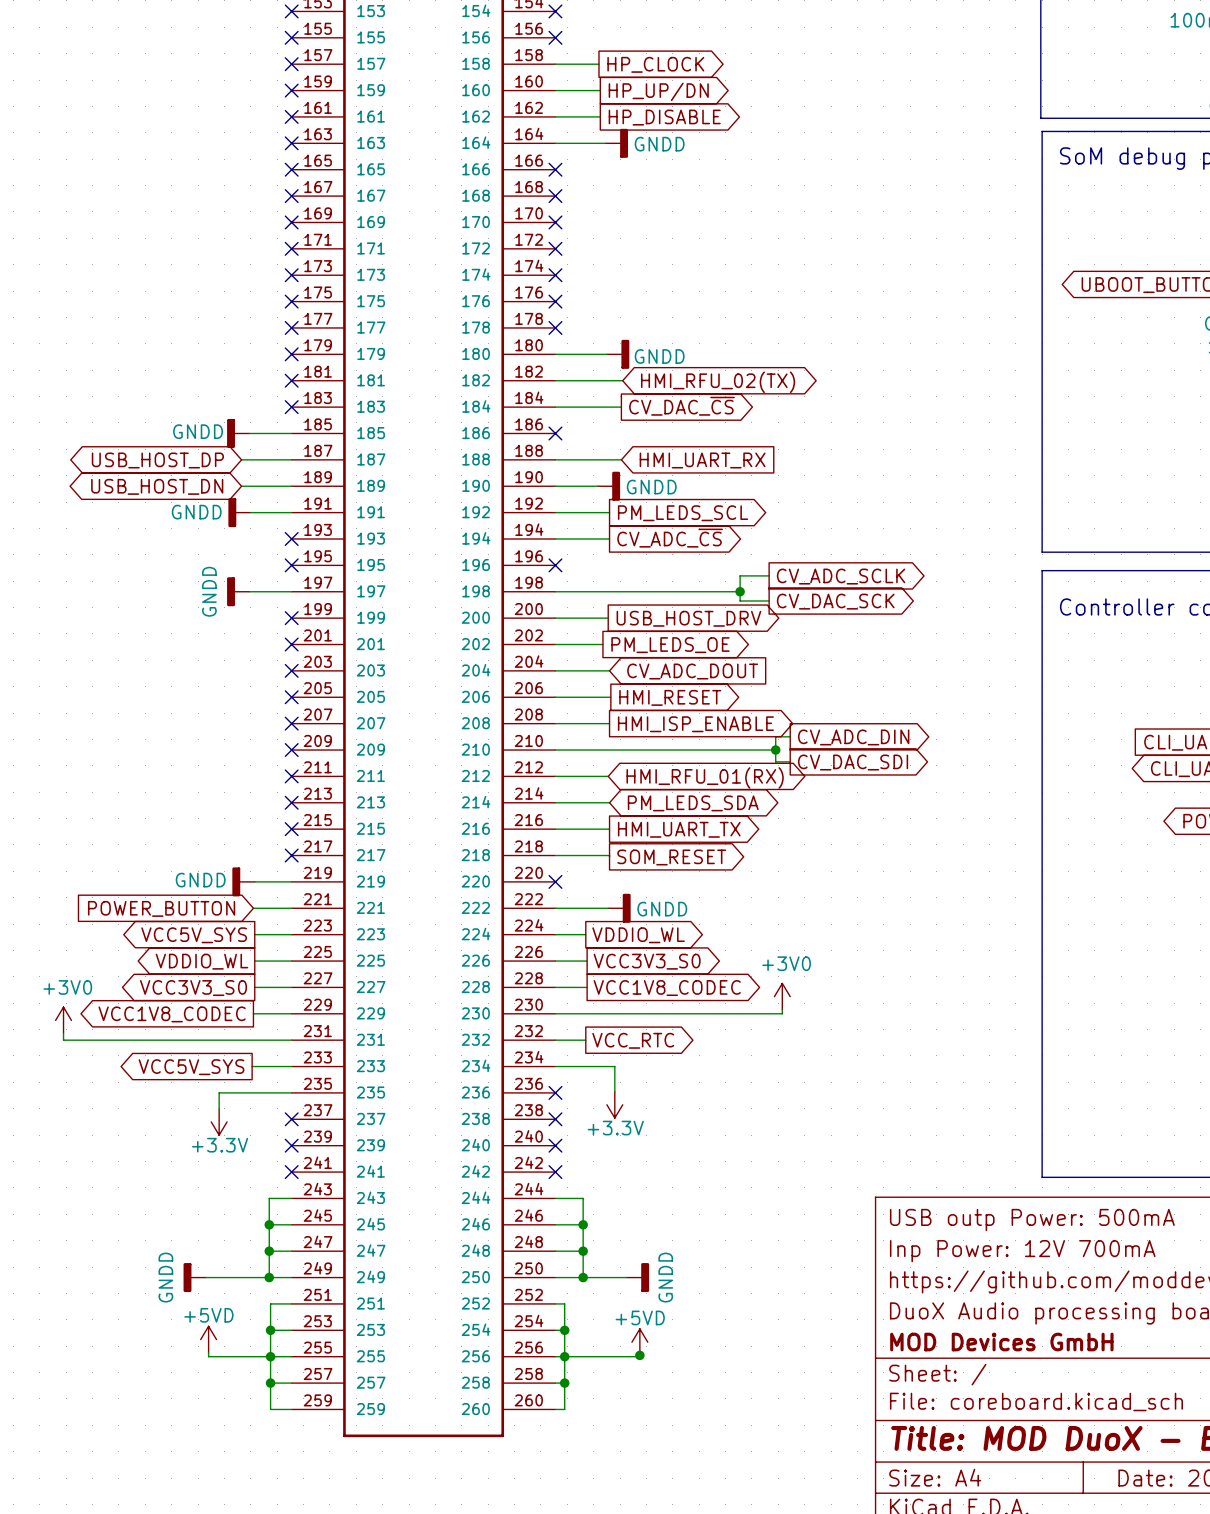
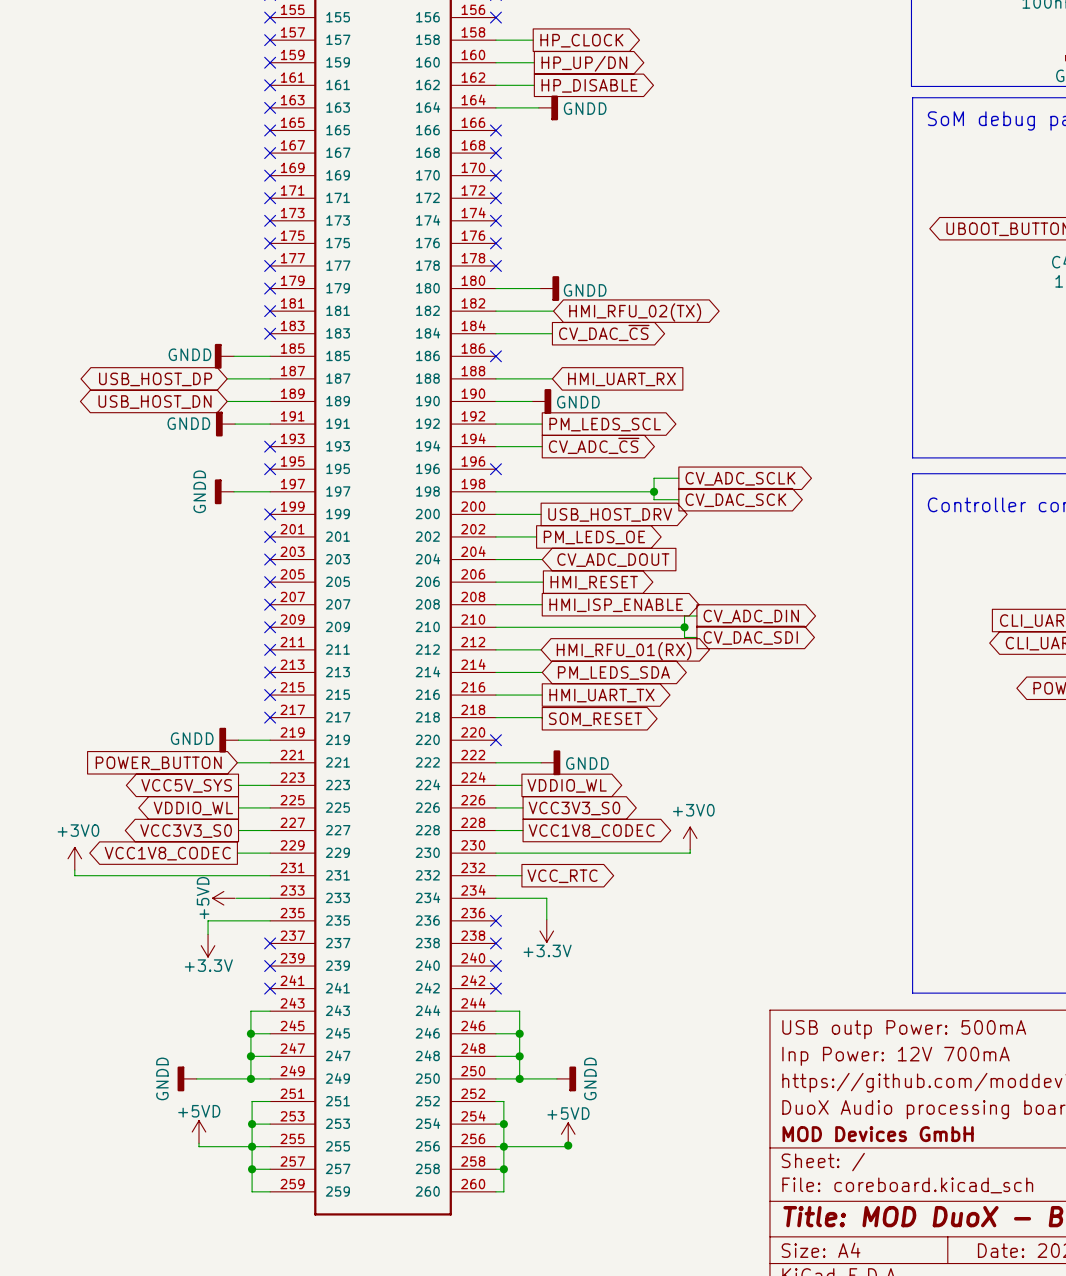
power symbol: none -> +5VD (223, 898)
global label: VCC5V_SYS (191, 1067) -> none

